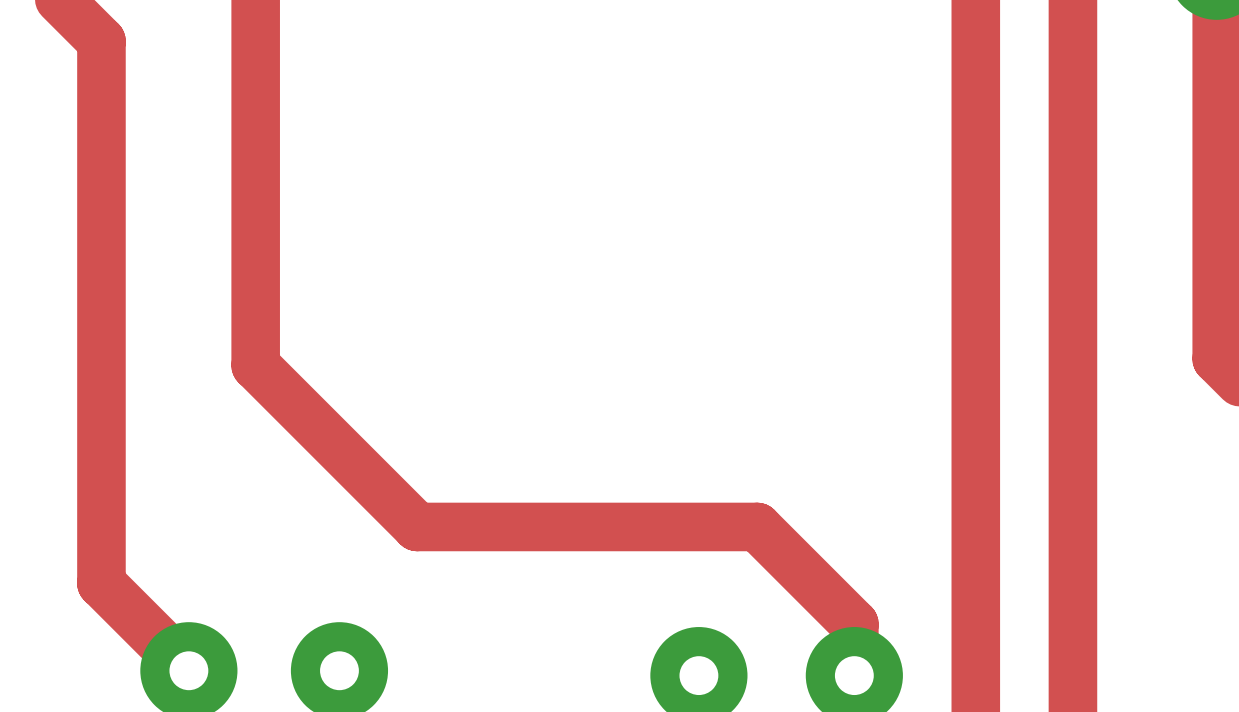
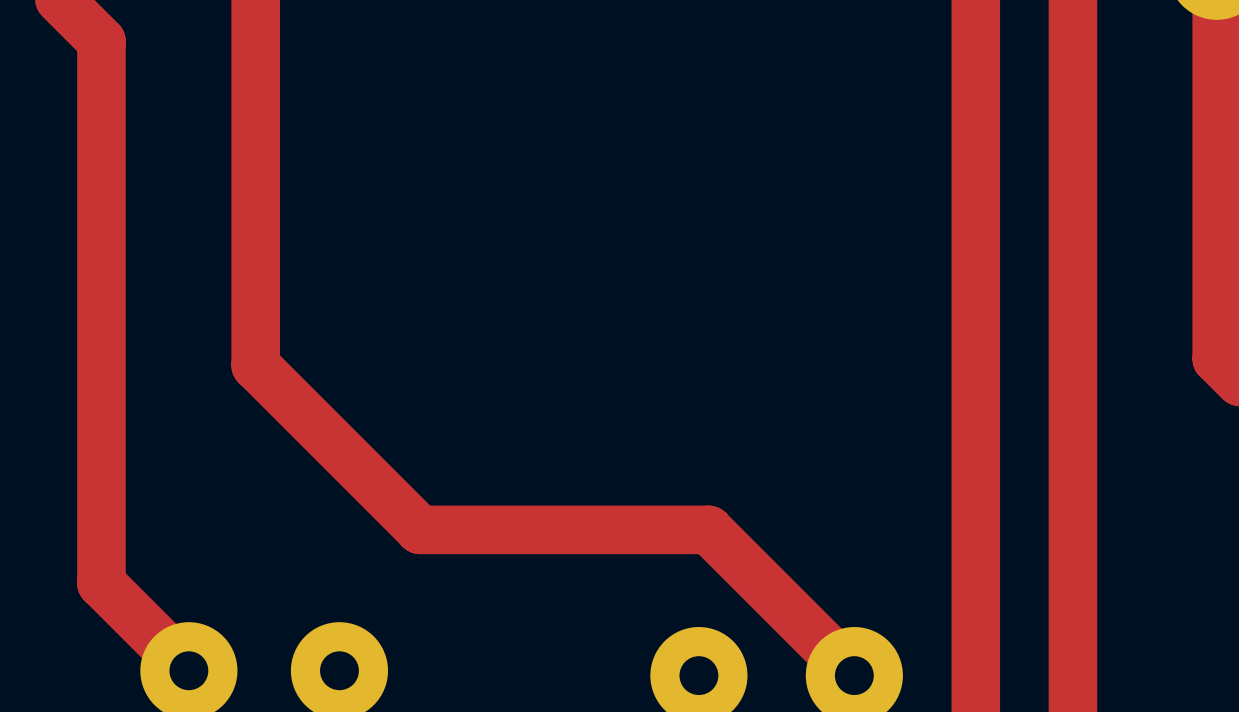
top track: (417, 526) (757, 526) (854, 624) (854, 675) -> (417, 526) (420, 529) (708, 529) (854, 675)

